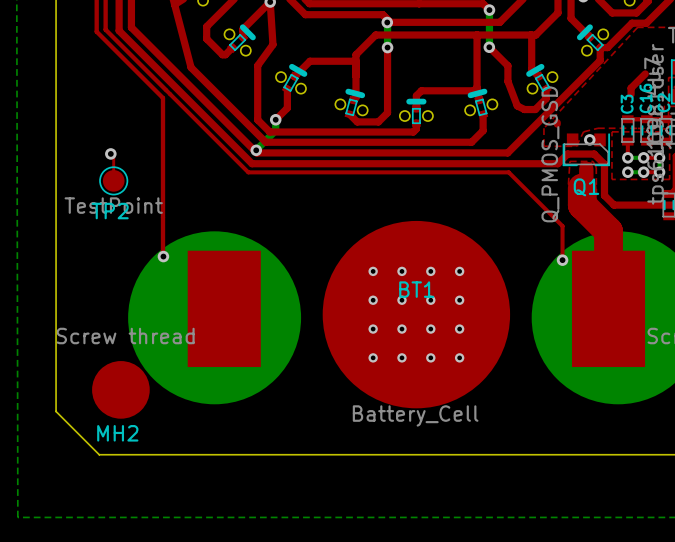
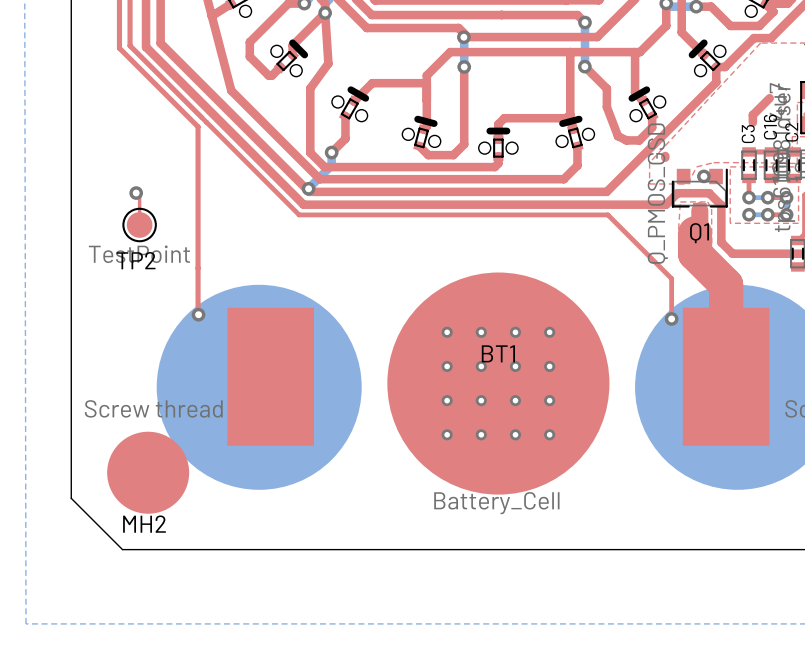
MH2 footprint: [92, 361, 150, 419] -> [107, 431, 190, 514]

